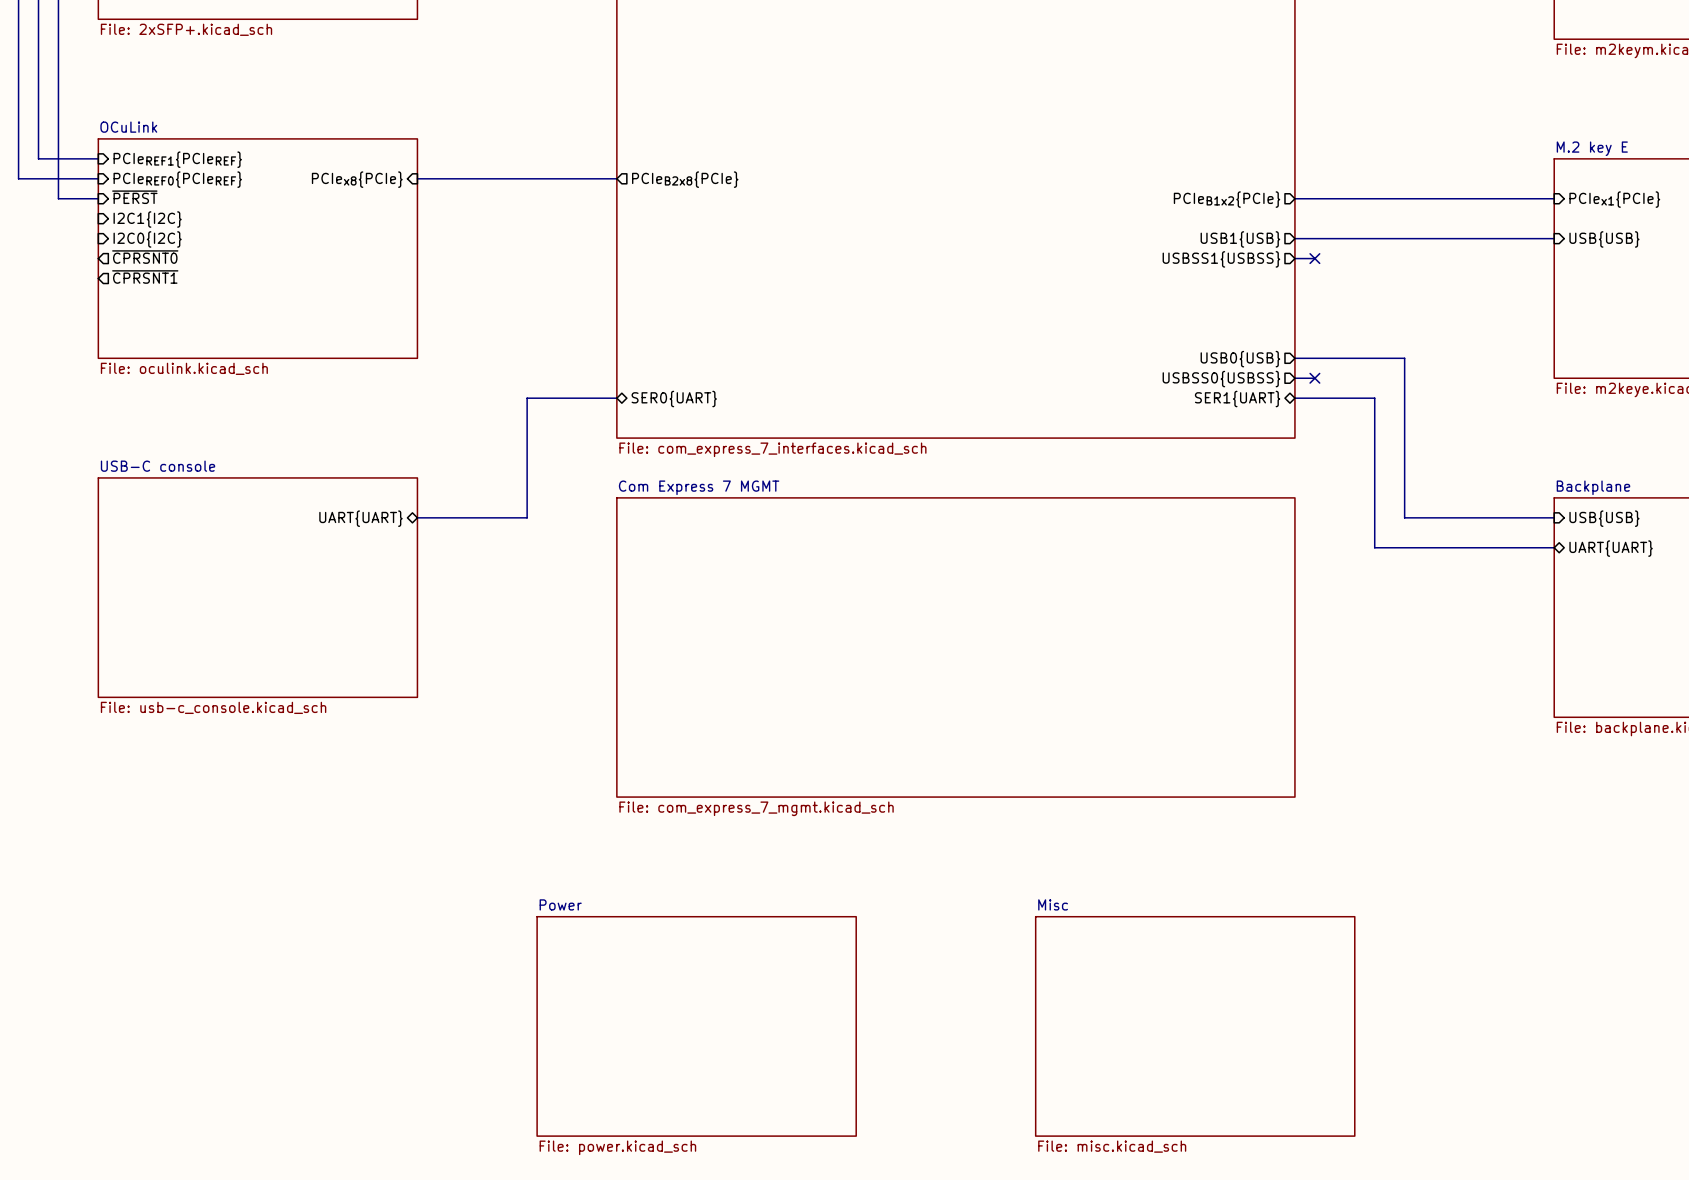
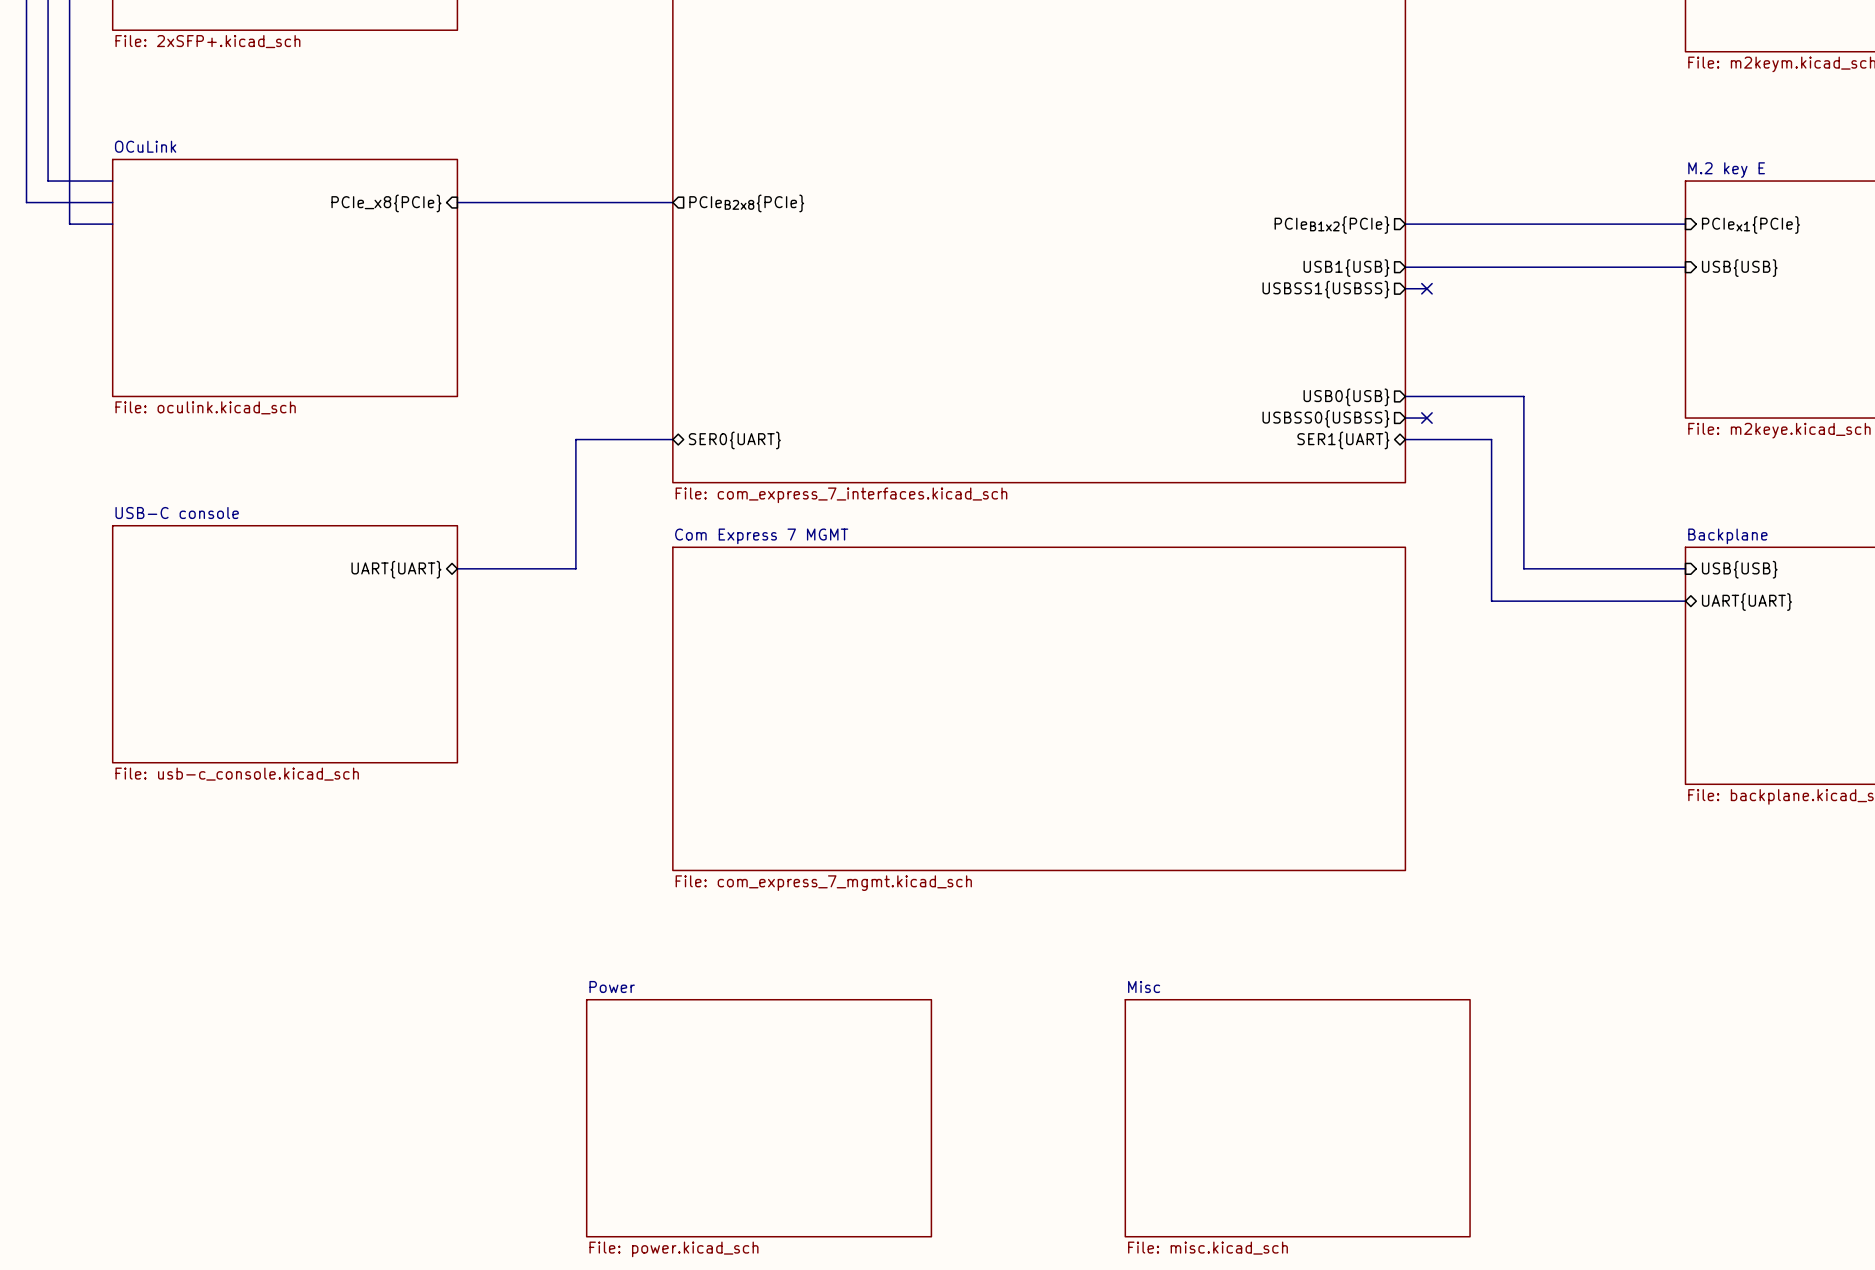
sheet pin: PCIeREF1{PCIeREF} (177, 159) -> none
sheet pin: PCIeREF0{PCIeREF} (177, 179) -> none
sheet pin: PCIex8{PCIe} (357, 179) -> PCIe_x8{PCIe} (386, 203)
sheet pin: ~{PERST} (134, 197) -> none
sheet pin: I2C1{I2C} (147, 219) -> none
sheet pin: I2C0{I2C} (147, 239) -> none
sheet pin: ~{CPRSNT0} (145, 257) -> none
sheet pin: ~{CPRSNT1} (145, 277) -> none

